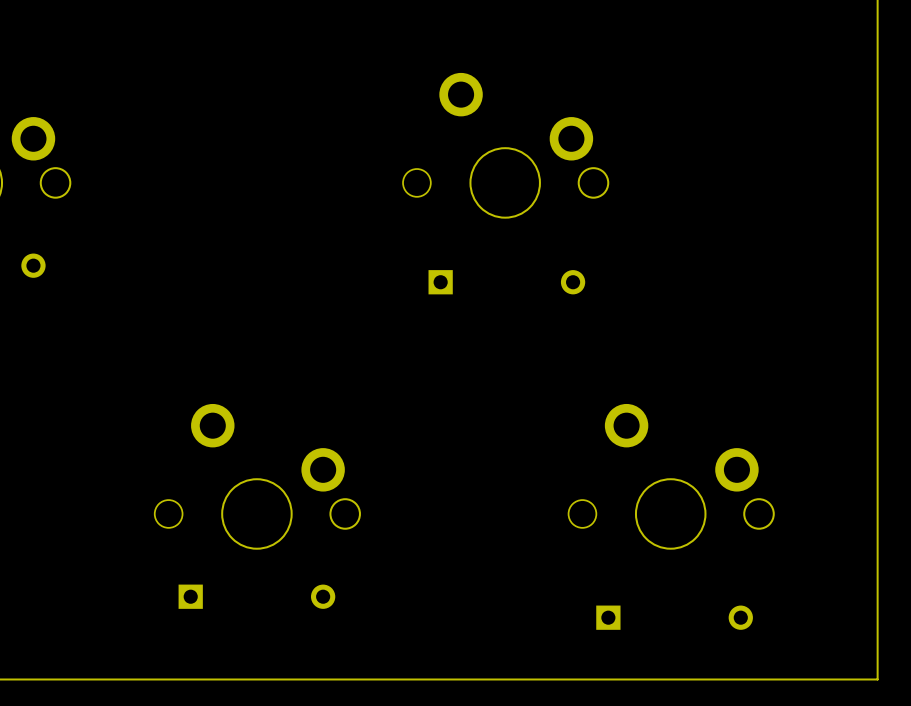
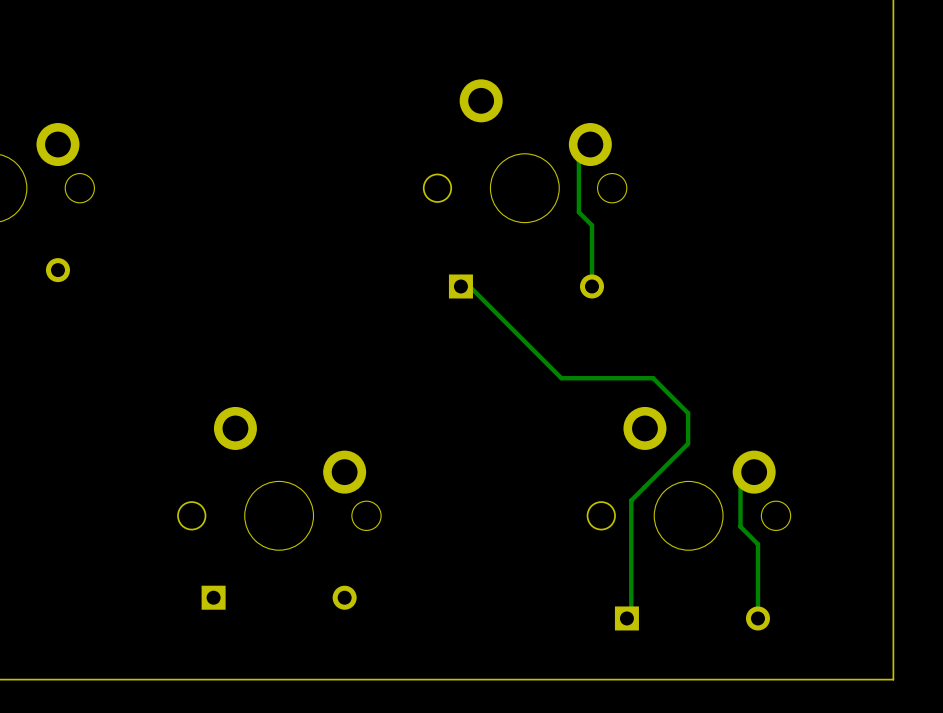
bottom track: none -> (578, 155) (578, 212) (591, 225) (591, 286)
bottom track: none -> (469, 286) (561, 378) (653, 378) (688, 413) (688, 443) (631, 500) (631, 614)
bottom track: none -> (740, 485) (740, 526) (757, 544) (757, 618)

